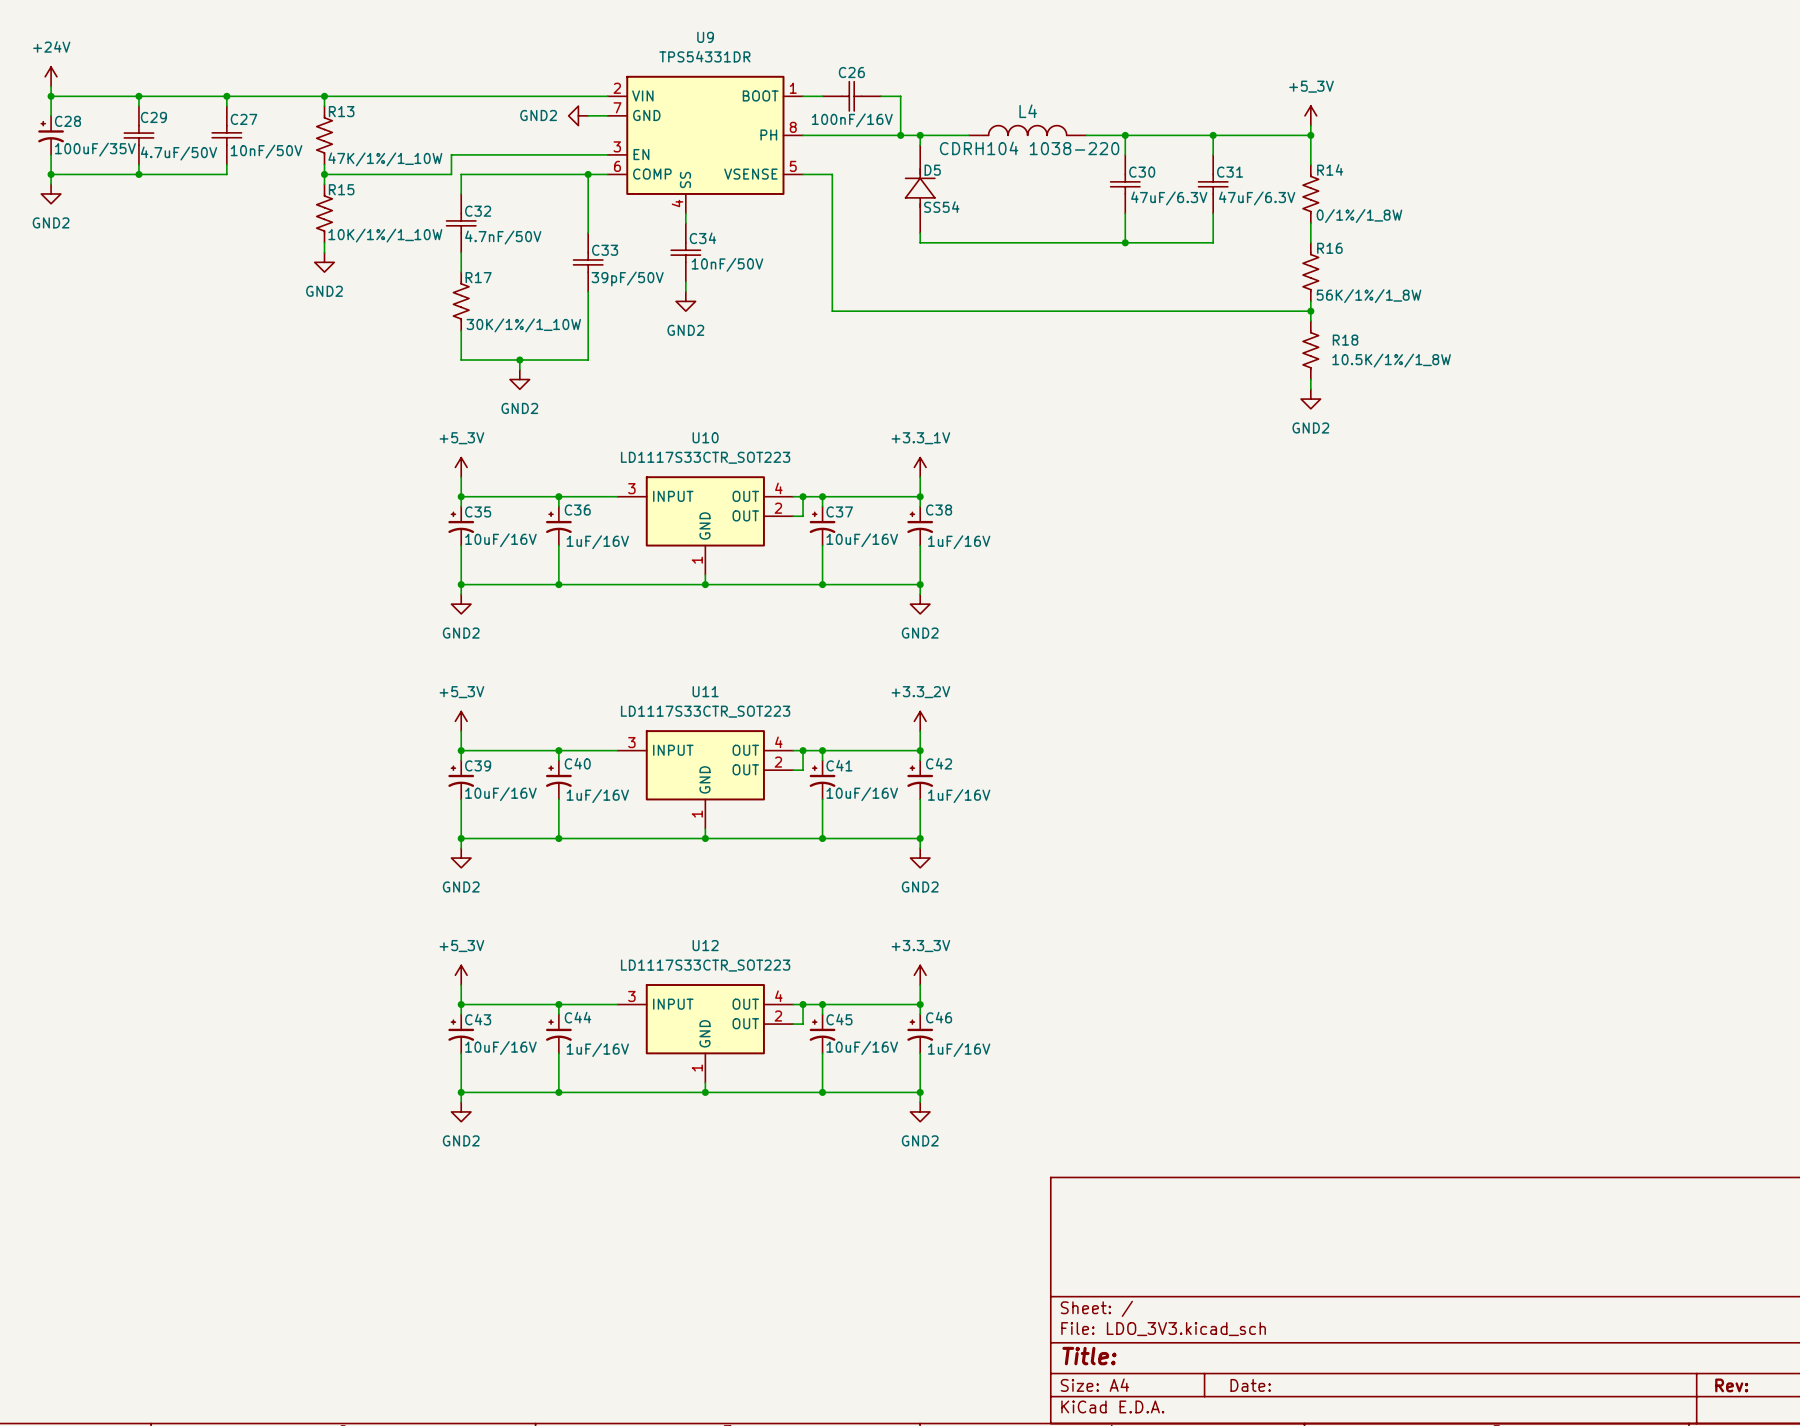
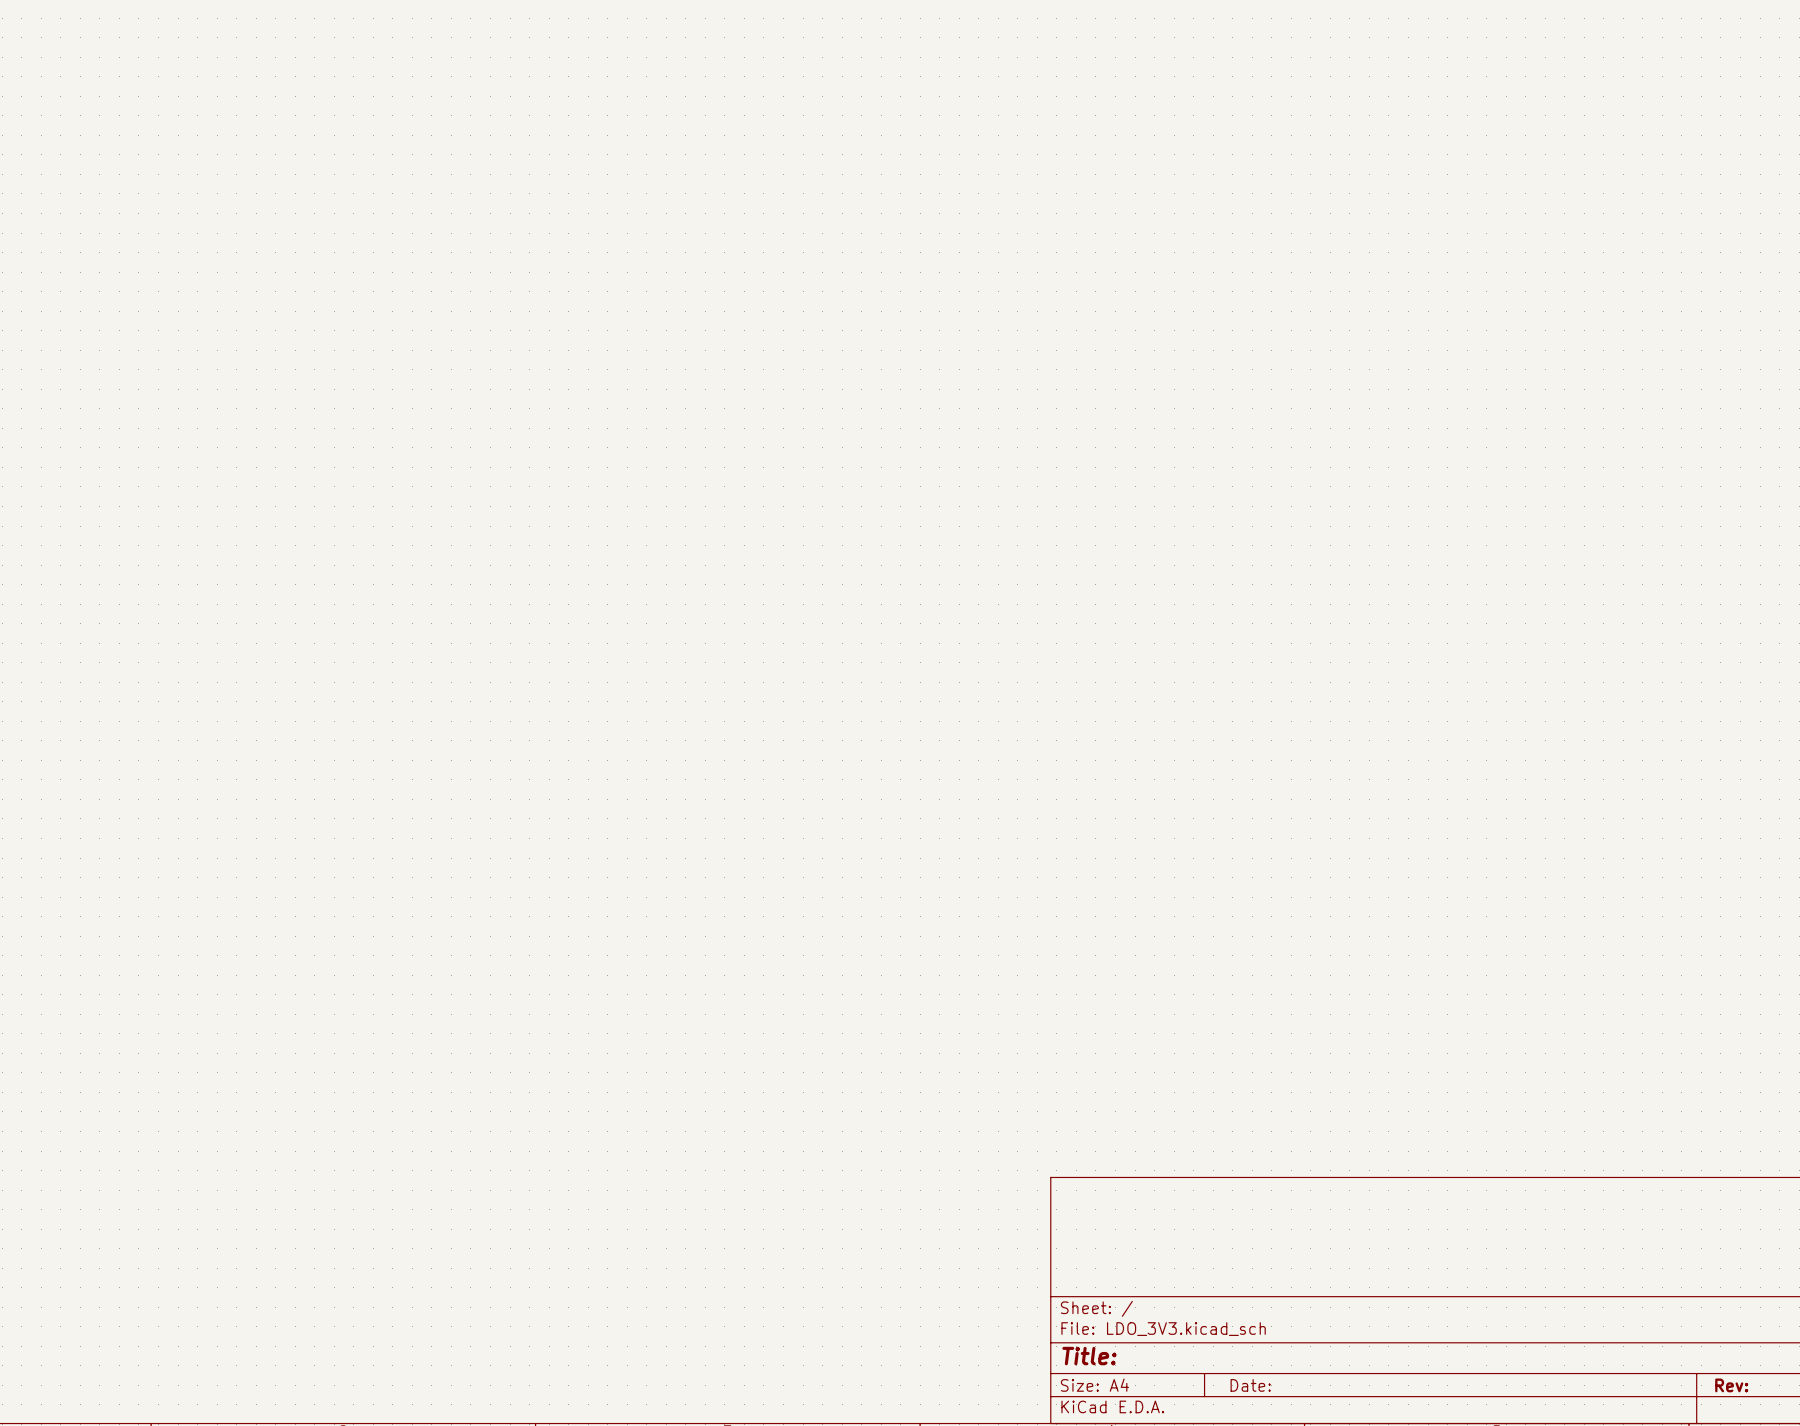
power symbol: +24V (51, 76) -> none
wire: (51, 86) (51, 115) -> none
wire: (51, 96) (607, 96) -> none
junction: (51, 96) -> none
wire: (138, 96) (138, 106) -> none
junction: (138, 96) -> none
wire: (226, 96) (226, 106) -> none
junction: (226, 96) -> none
wire: (324, 96) (324, 106) -> none
junction: (324, 96) -> none
wire: (803, 96) (822, 96) -> none
C26: 100nF/16V (851, 96) -> none
wire: (881, 96) (900, 96) (900, 135) -> none
power symbol: GND2 (578, 115) -> none
wire: (588, 115) (607, 115) -> none
power symbol: +5_3V (1310, 115) -> none
wire: (1310, 125) (1310, 164) -> none
L4: CDRH104 1038-220 (1027, 130) -> none
C28: 100uF/35V (51, 135) -> none
C29: 4.7uF/50V (138, 135) -> none
C27: 10nF/50V (226, 135) -> none
R13: 47K/1%/1_10W (324, 135) -> none
wire: (803, 135) (969, 135) -> none
junction: (900, 135) -> none
wire: (920, 135) (920, 145) -> none
junction: (920, 135) -> none
wire: (1086, 135) (1310, 135) -> none
wire: (1125, 135) (1125, 154) -> none
junction: (1125, 135) -> none
wire: (1213, 135) (1213, 154) -> none
junction: (1213, 135) -> none
junction: (1310, 135) -> none
U9: TPS54331DR (705, 144) -> none
wire: (51, 154) (51, 184) -> none
wire: (607, 154) (451, 154) (451, 174) (324, 174) -> none
wire: (138, 164) (138, 174) -> none
wire: (226, 164) (226, 174) (51, 174) -> none
wire: (324, 164) (324, 184) -> none
junction: (51, 174) -> none
junction: (138, 174) -> none
junction: (324, 174) -> none
wire: (588, 174) (588, 233) -> none
junction: (588, 174) -> none
wire: (607, 174) (461, 174) (461, 193) -> none
wire: (803, 174) (832, 174) (832, 311) (1310, 311) -> none
C30: 47uF/6.3V (1125, 184) -> none
C31: 47uF/6.3V (1213, 184) -> none
D5: SS54 (920, 189) -> none
power symbol: GND2 (51, 193) -> none
R14: 0/1%/1_8W (1310, 193) -> none
R15: 10K/1%/1_10W (324, 213) -> none
wire: (685, 213) (685, 223) -> none
wire: (1125, 213) (1125, 242) -> none
wire: (1213, 213) (1213, 242) (920, 242) (920, 233) -> none
C32: 4.7nF/50V (461, 223) -> none
wire: (1310, 223) (1310, 242) -> none
wire: (324, 242) (324, 252) -> none
junction: (1125, 242) -> none
wire: (461, 252) (461, 272) -> none
C34: 10nF/50V (685, 252) -> none
power symbol: GND2 (324, 262) -> none
C33: 39pF/50V (588, 262) -> none
R16: 56K/1%/1_8W (1310, 272) -> none
wire: (685, 281) (685, 291) -> none
wire: (588, 291) (588, 360) (461, 360) (461, 330) -> none
R17: 30K/1%/1_10W (461, 301) -> none
power symbol: GND2 (685, 301) -> none
wire: (1310, 301) (1310, 320) -> none
junction: (1310, 311) -> none
R18: 10.5K/1%/1_8W (1310, 350) -> none
wire: (519, 360) (519, 369) -> none
junction: (519, 360) -> none
power symbol: GND2 (519, 379) -> none
wire: (1310, 379) (1310, 389) -> none
power symbol: GND2 (1310, 399) -> none
power symbol: +5_3V (461, 467) -> none
power symbol: +3.3_1V (920, 467) -> none
wire: (461, 477) (461, 506) -> none
wire: (920, 477) (920, 506) -> none
wire: (461, 496) (617, 496) -> none
junction: (461, 496) -> none
wire: (558, 496) (558, 506) -> none
junction: (558, 496) -> none
wire: (793, 496) (920, 496) -> none
wire: (803, 496) (803, 516) (793, 516) -> none
junction: (803, 496) -> none
wire: (822, 496) (822, 506) -> none
junction: (822, 496) -> none
junction: (920, 496) -> none
U10: LD1117S33CTR_SOT223 (705, 525) -> none
C35: 10uF/16V (461, 526) -> none
C36: 1uF/16V (558, 526) -> none
C37: 10uF/16V (822, 526) -> none
C38: 1uF/16V (920, 526) -> none
wire: (461, 545) (461, 594) -> none
wire: (558, 545) (558, 584) -> none
wire: (822, 545) (822, 584) -> none
wire: (920, 545) (920, 594) -> none
wire: (705, 574) (705, 584) -> none
wire: (461, 584) (920, 584) -> none
junction: (461, 584) -> none
junction: (558, 584) -> none
junction: (705, 584) -> none
junction: (822, 584) -> none
junction: (920, 584) -> none
power symbol: GND2 (461, 604) -> none
power symbol: GND2 (920, 604) -> none
power symbol: +5_3V (461, 721) -> none
power symbol: +3.3_2V (920, 721) -> none
wire: (461, 731) (461, 760) -> none
wire: (920, 731) (920, 760) -> none
wire: (461, 750) (617, 750) -> none
junction: (461, 750) -> none
wire: (558, 750) (558, 760) -> none
junction: (558, 750) -> none
wire: (793, 750) (920, 750) -> none
wire: (803, 750) (803, 770) (793, 770) -> none
junction: (803, 750) -> none
wire: (822, 750) (822, 760) -> none
junction: (822, 750) -> none
junction: (920, 750) -> none
C39: 10uF/16V (461, 779) -> none
C40: 1uF/16V (558, 779) -> none
U11: LD1117S33CTR_SOT223 (705, 779) -> none
C41: 10uF/16V (822, 779) -> none
C42: 1uF/16V (920, 779) -> none
wire: (461, 799) (461, 848) -> none
wire: (558, 799) (558, 838) -> none
wire: (822, 799) (822, 838) -> none
wire: (920, 799) (920, 848) -> none
wire: (705, 828) (705, 838) -> none
wire: (461, 838) (920, 838) -> none
junction: (461, 838) -> none
junction: (558, 838) -> none
junction: (705, 838) -> none
junction: (822, 838) -> none
junction: (920, 838) -> none
power symbol: GND2 (461, 858) -> none
power symbol: GND2 (920, 858) -> none
power symbol: +5_3V (461, 975) -> none
power symbol: +3.3_3V (920, 975) -> none
wire: (461, 985) (461, 1014) -> none
wire: (920, 985) (920, 1014) -> none
wire: (461, 1004) (617, 1004) -> none
junction: (461, 1004) -> none
wire: (558, 1004) (558, 1014) -> none
junction: (558, 1004) -> none
wire: (793, 1004) (920, 1004) -> none
wire: (803, 1004) (803, 1024) (793, 1024) -> none
junction: (803, 1004) -> none
wire: (822, 1004) (822, 1014) -> none
junction: (822, 1004) -> none
junction: (920, 1004) -> none
C43: 10uF/16V (461, 1033) -> none
C44: 1uF/16V (558, 1033) -> none
U12: LD1117S33CTR_SOT223 (705, 1033) -> none
C45: 10uF/16V (822, 1033) -> none
C46: 1uF/16V (920, 1033) -> none
wire: (461, 1053) (461, 1102) -> none
wire: (558, 1053) (558, 1092) -> none
wire: (822, 1053) (822, 1092) -> none
wire: (920, 1053) (920, 1102) -> none
wire: (705, 1082) (705, 1092) -> none
wire: (461, 1092) (920, 1092) -> none
junction: (461, 1092) -> none
junction: (558, 1092) -> none
junction: (705, 1092) -> none
junction: (822, 1092) -> none
junction: (920, 1092) -> none
power symbol: GND2 (461, 1111) -> none
power symbol: GND2 (920, 1111) -> none

